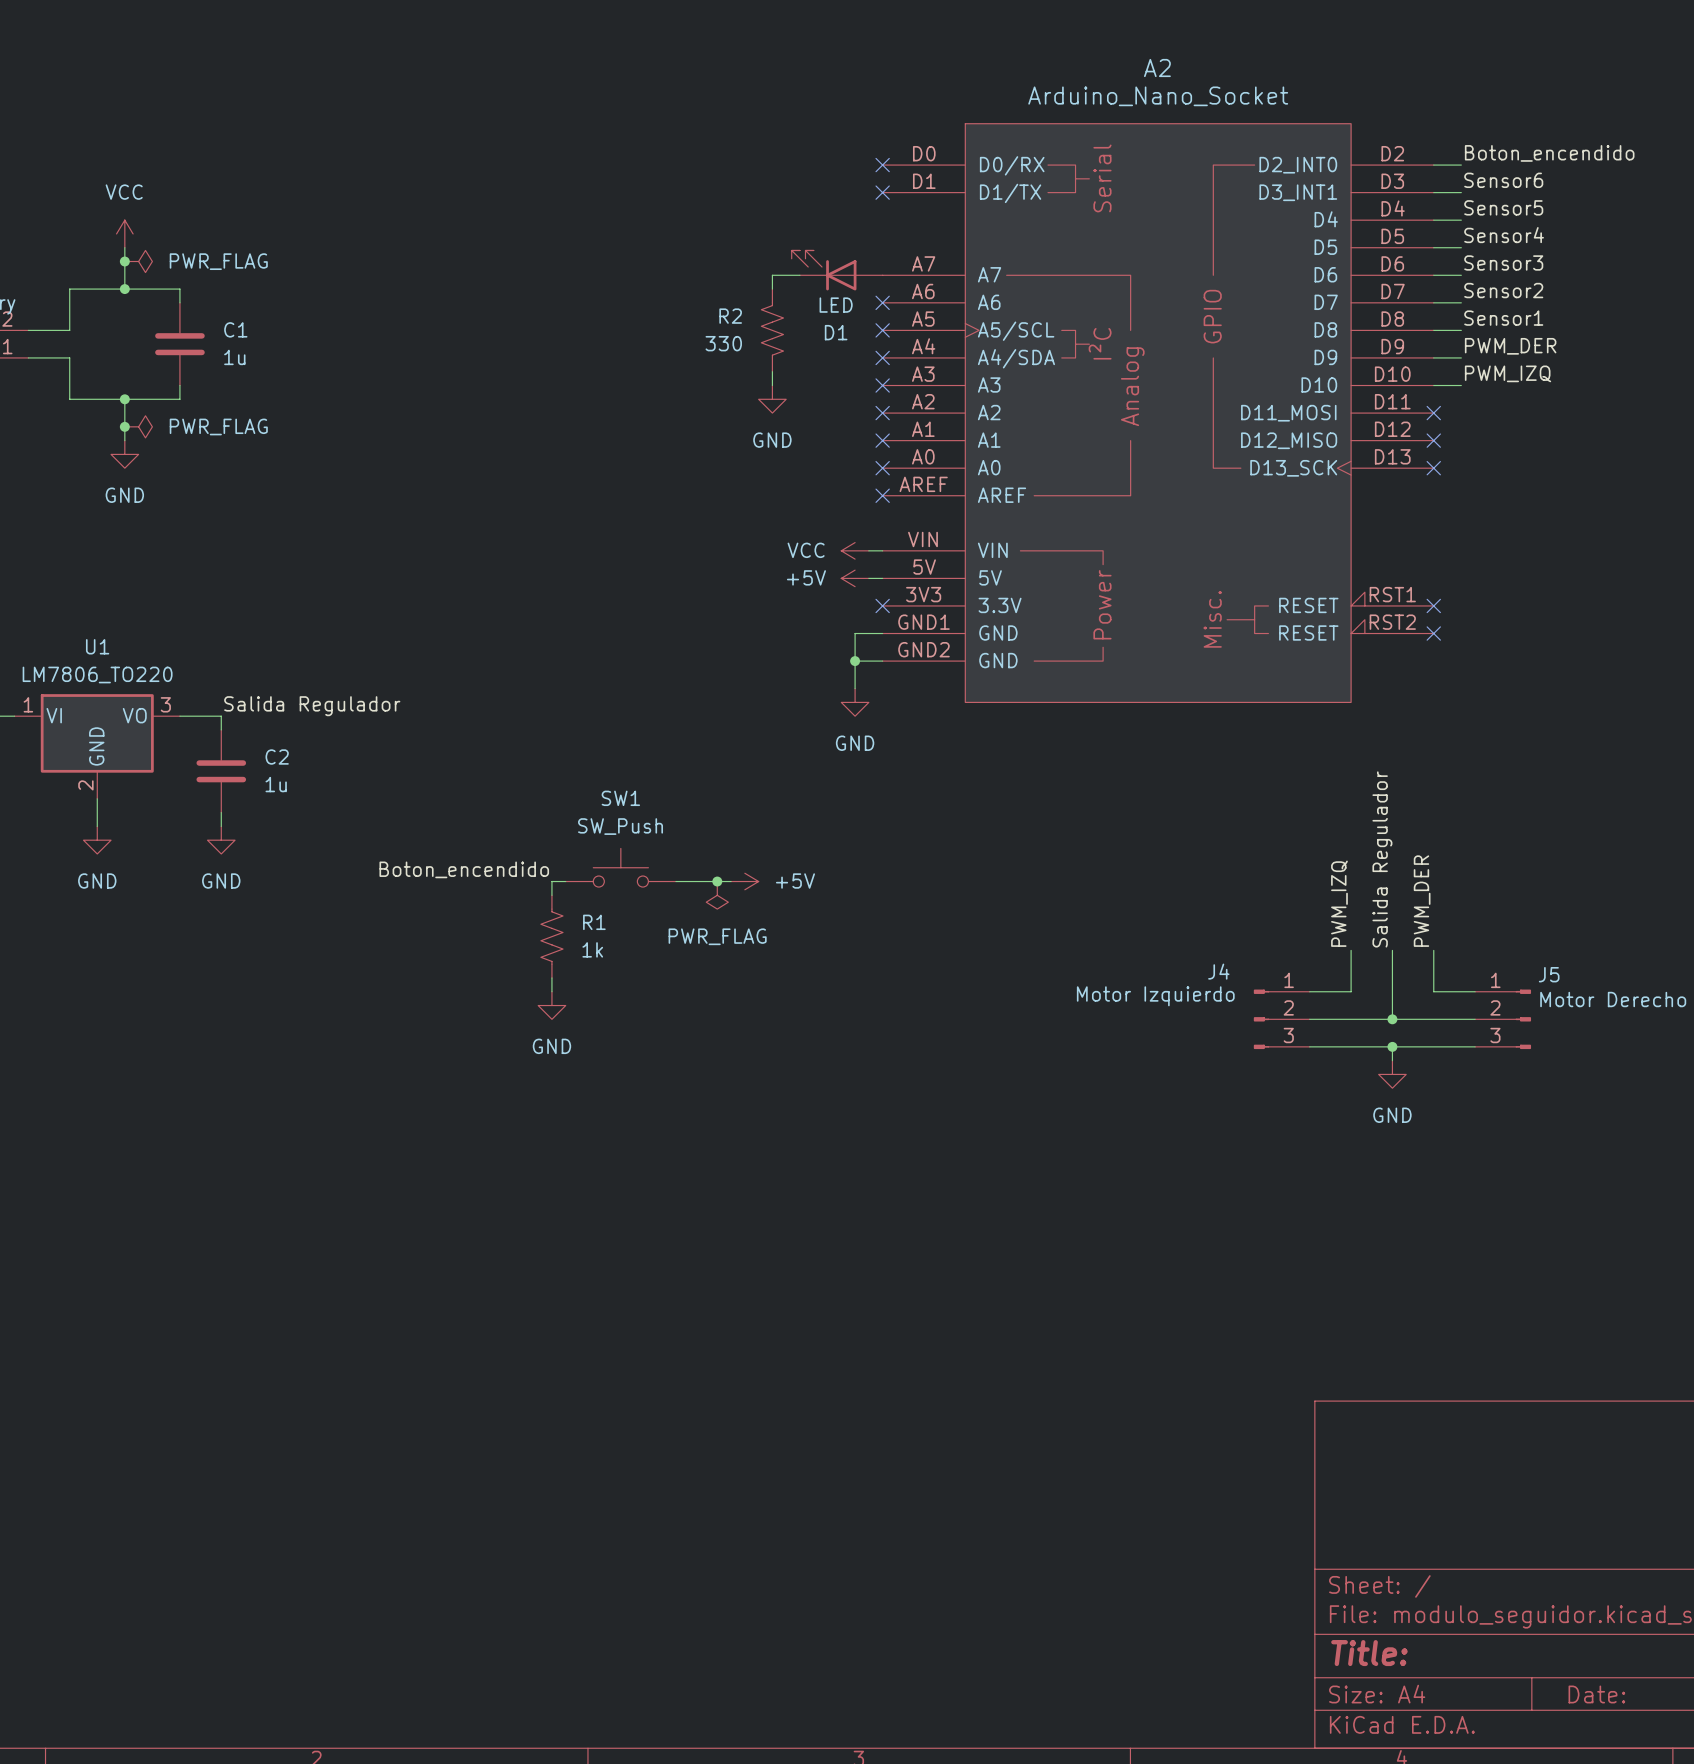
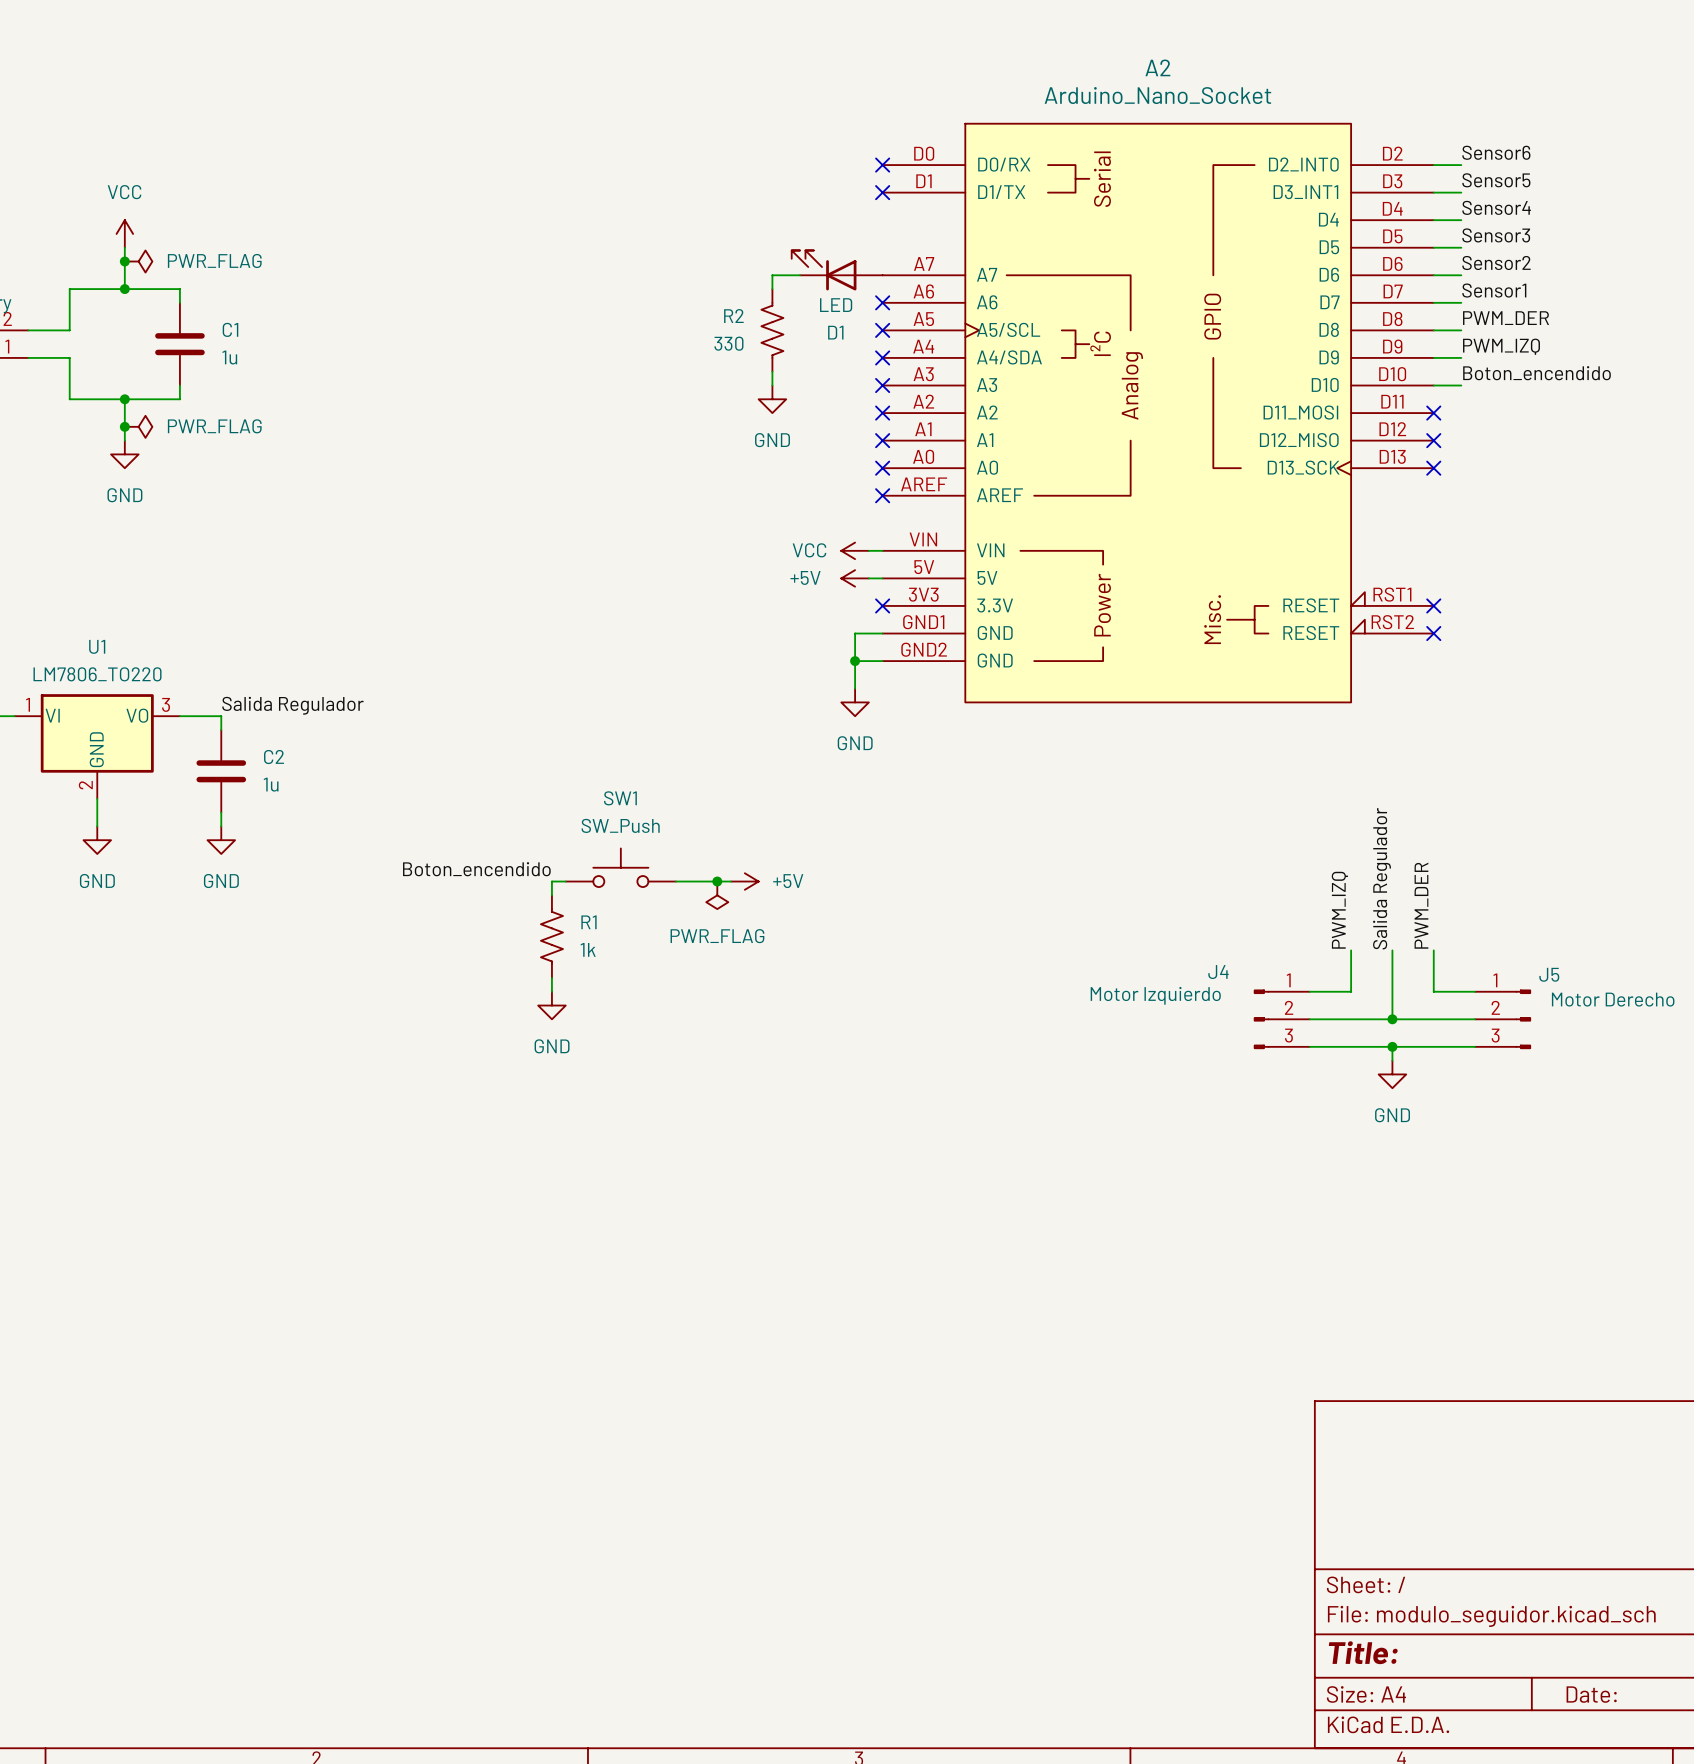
label: Boton_encendido (1549, 153) -> Sensor6 (1496, 152)
label: Sensor6 (1503, 180) -> Sensor5 (1496, 180)
label: Sensor5 (1503, 207) -> Sensor4 (1496, 207)
label: Sensor4 (1504, 235) -> Sensor3 (1496, 235)
label: Sensor3 (1503, 262) -> Sensor2 (1496, 263)
label: Sensor2 (1503, 290) -> Sensor1 (1494, 290)
label: Sensor1 (1503, 318) -> PWM_DER (1506, 318)
label: PWM_DER (1510, 346) -> PWM_IZQ (1501, 346)
label: PWM_IZQ (1508, 373) -> Boton_encendido (1537, 373)

